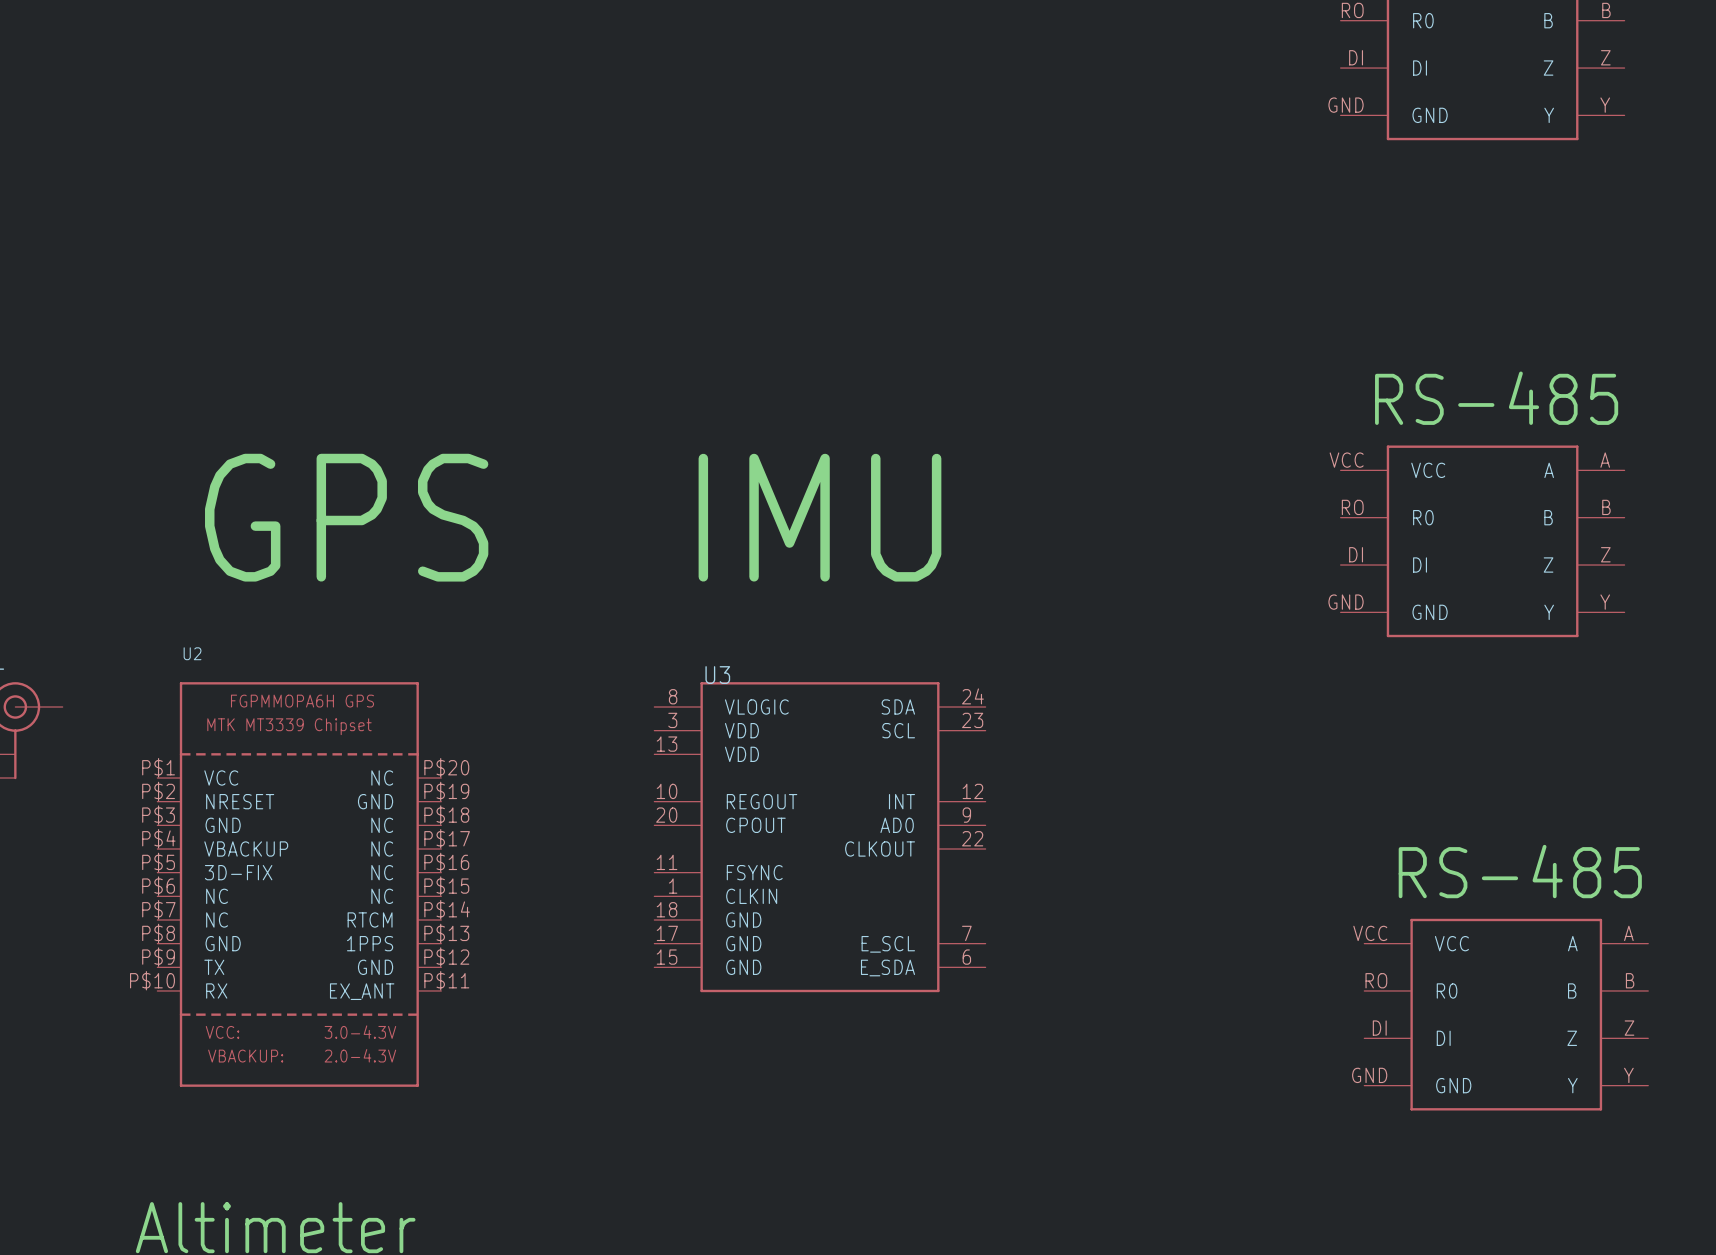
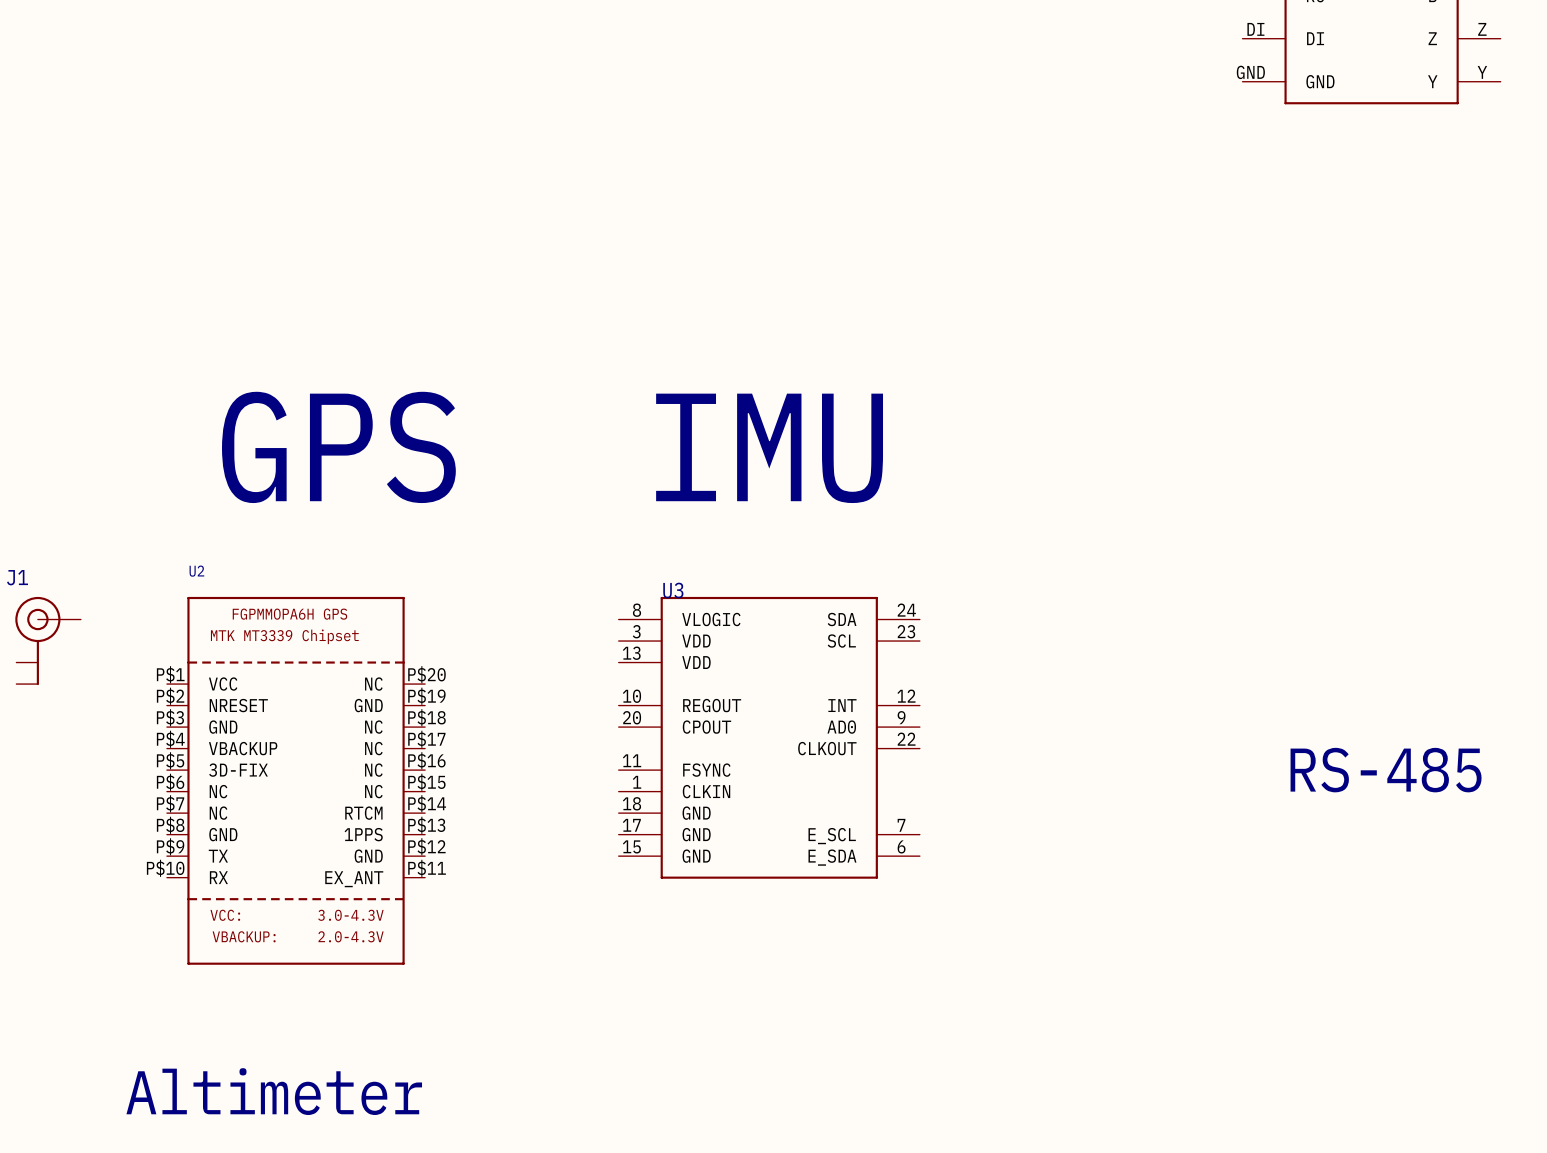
text: RS-485 (1496, 398) -> none
part: (1482, 541) -> none
part: (1506, 1014) -> none

